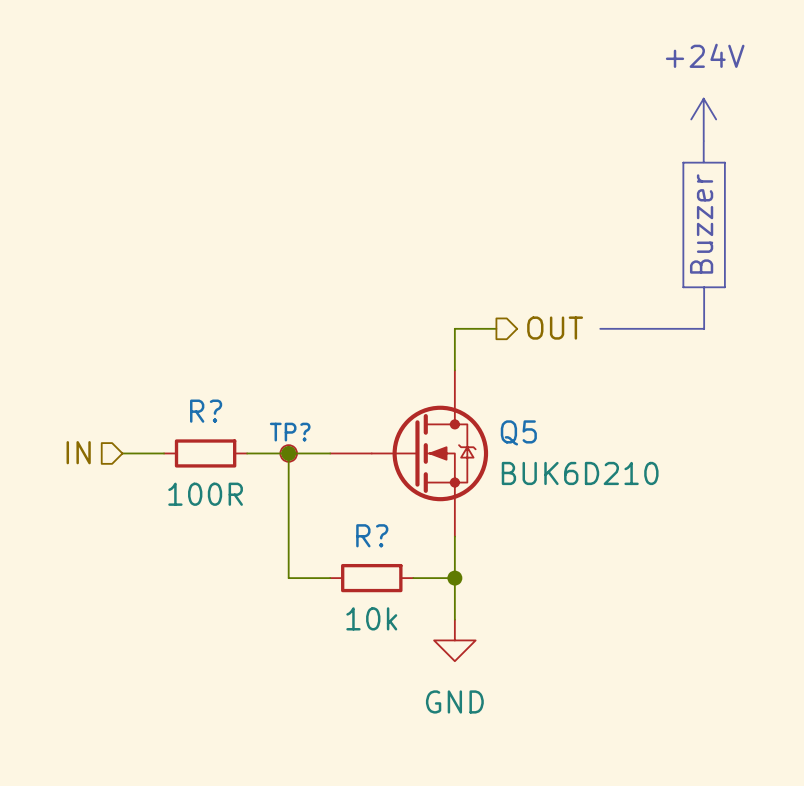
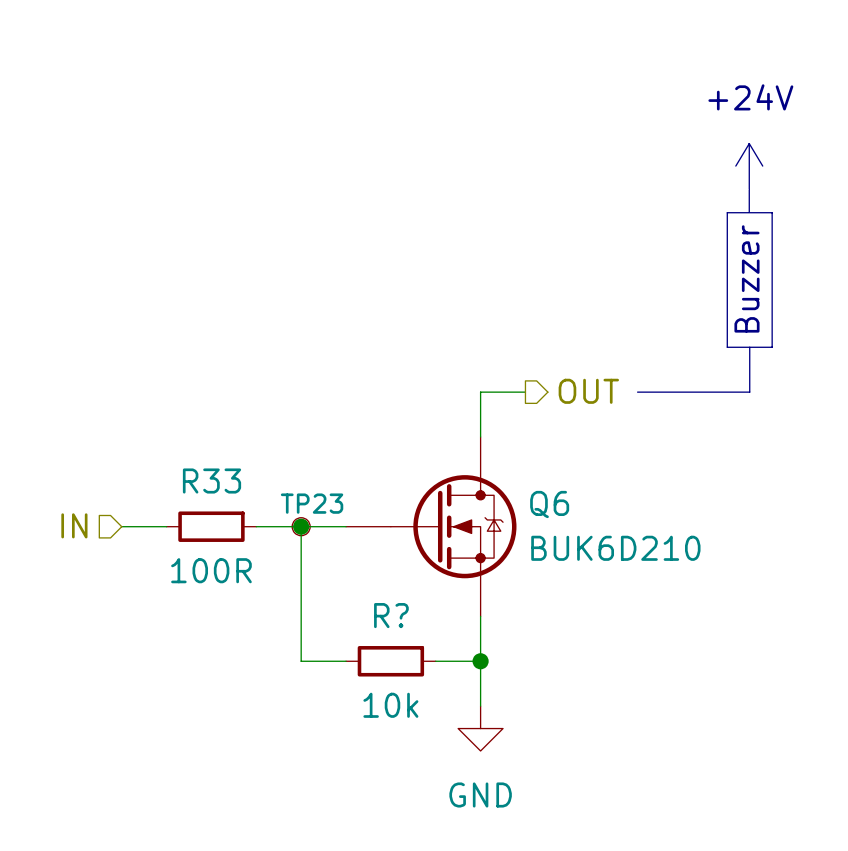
R? name: R? (206, 411) -> R33 (212, 481)
TP? name: TP? (290, 432) -> TP23 (312, 503)
Q5 name: Q5 (518, 432) -> Q6 (549, 504)

